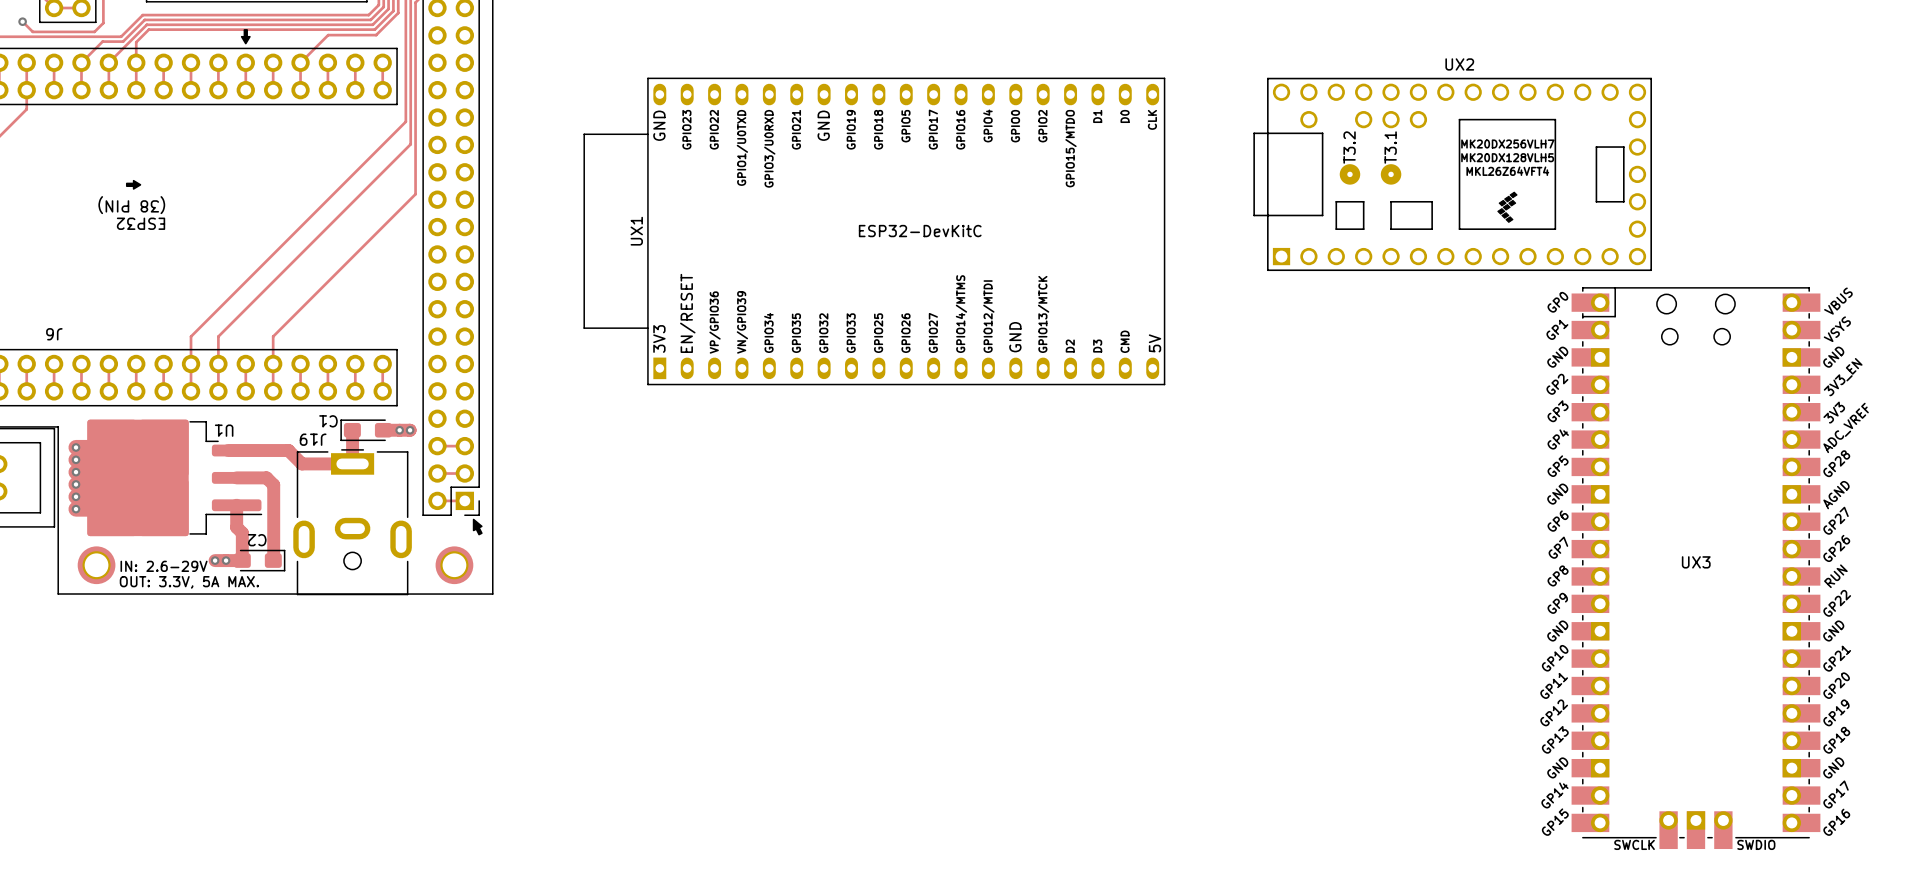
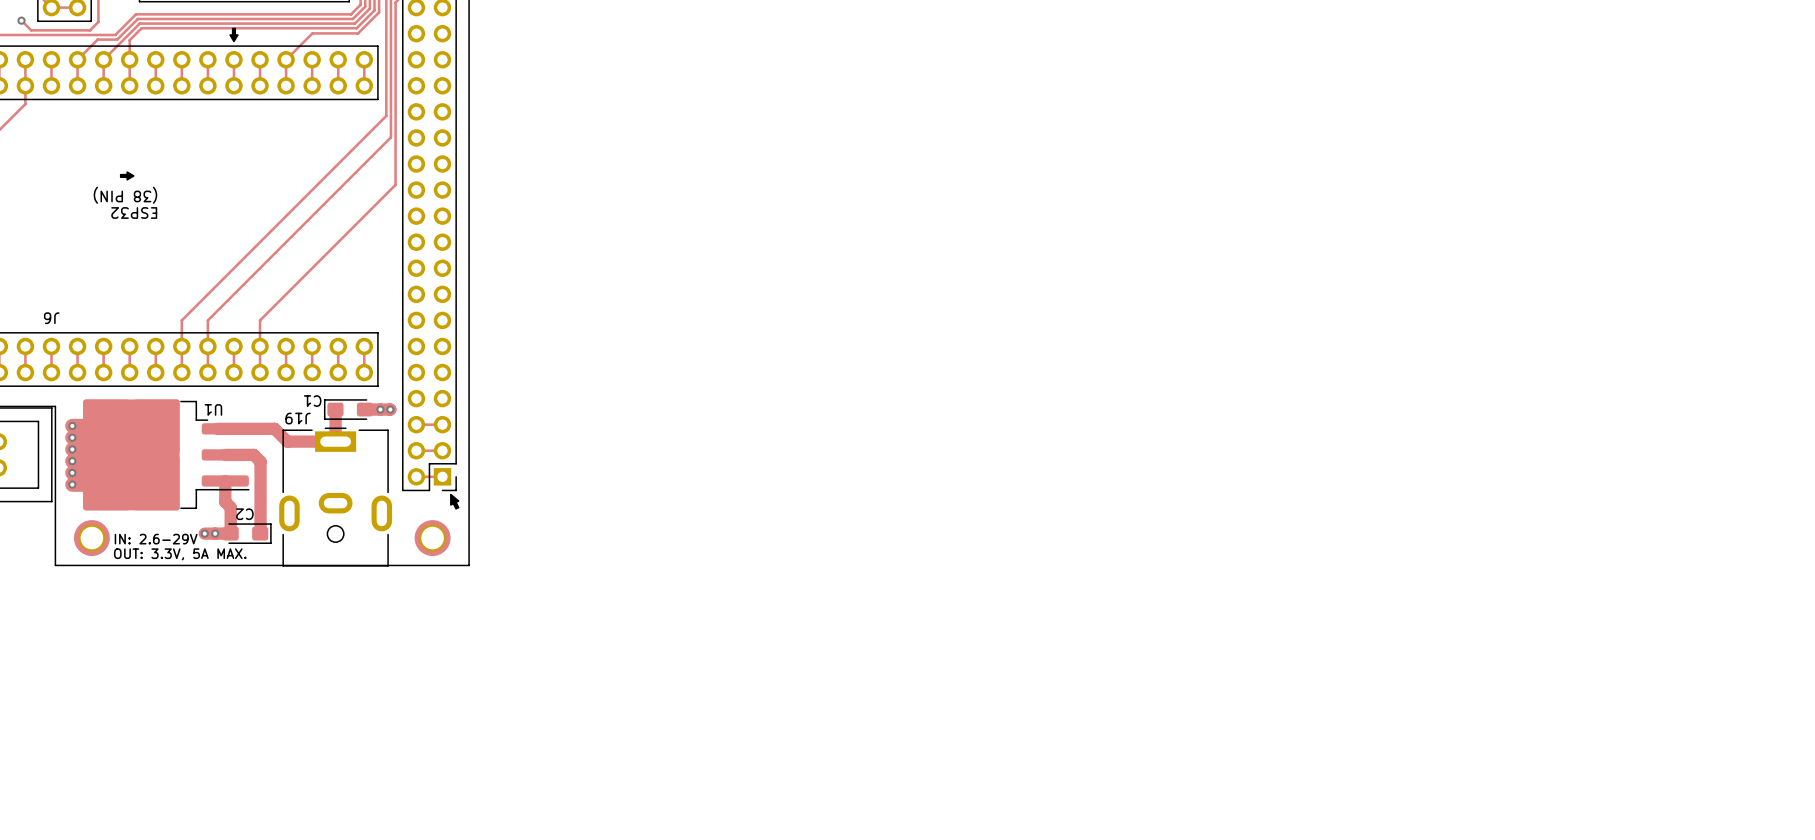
UX2: (1452, 174) -> none
UX1: ESP32-DevKitC (874, 231) -> none
UX3: (1695, 568) -> none

